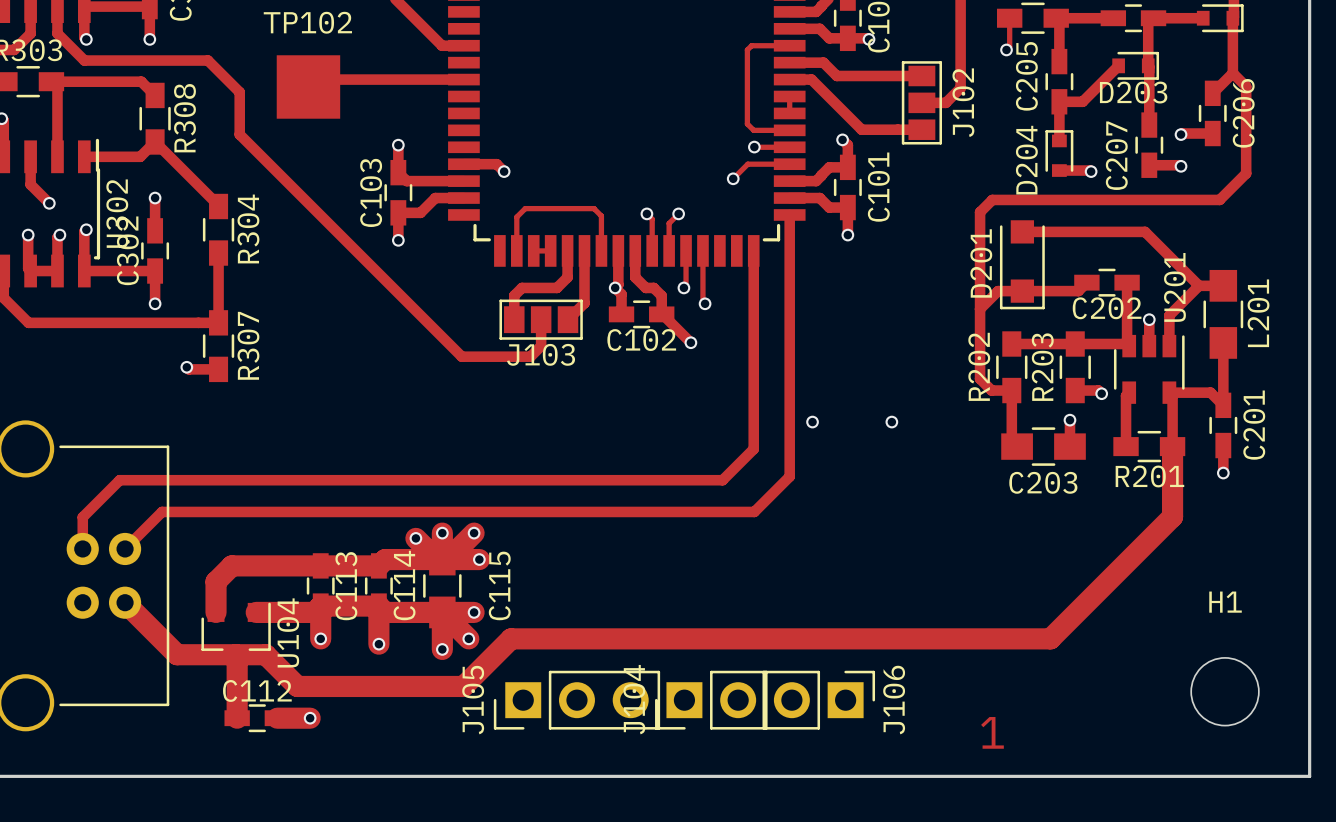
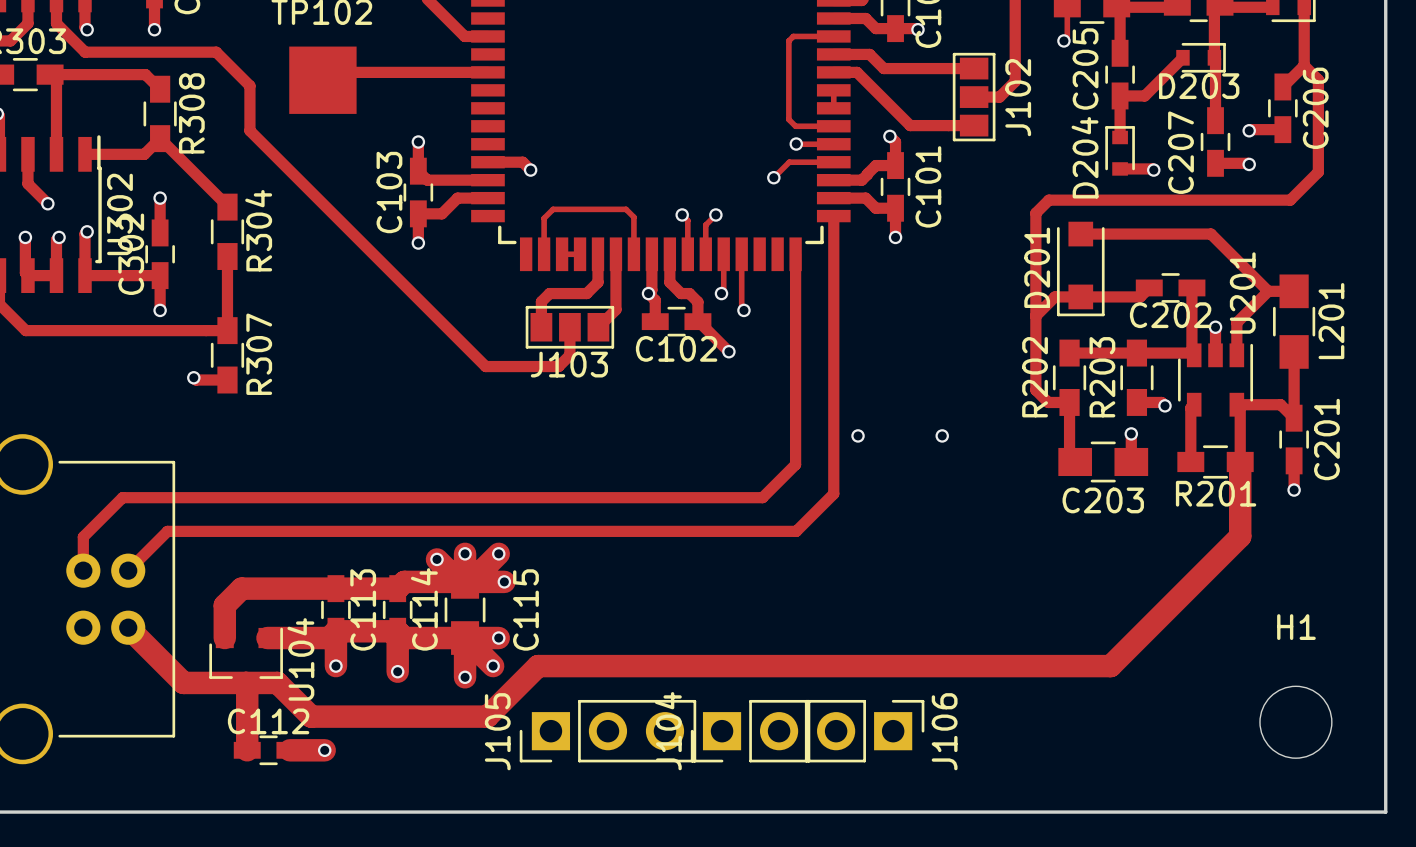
text: 1 (992, 732) -> none

